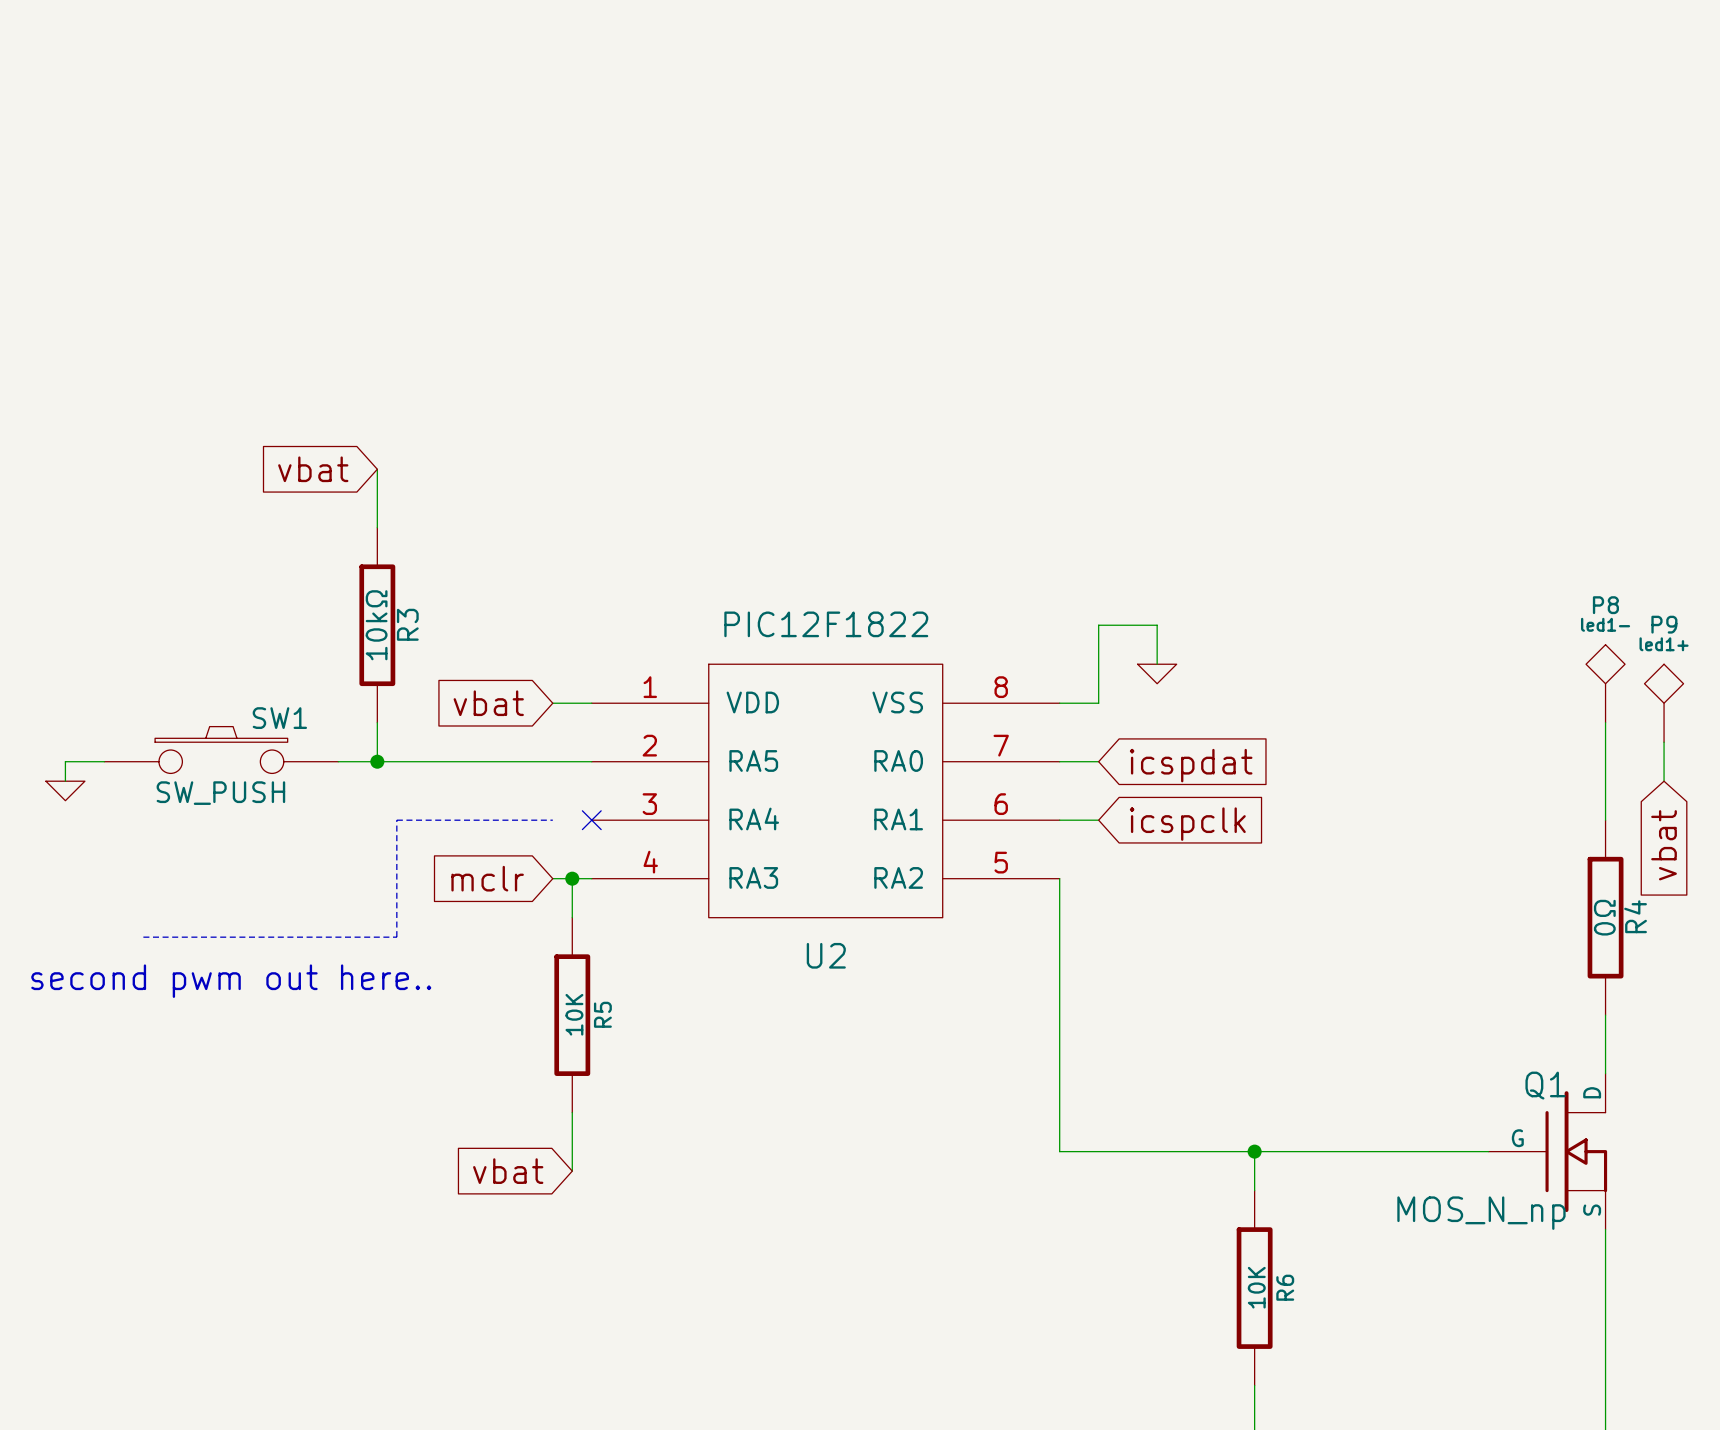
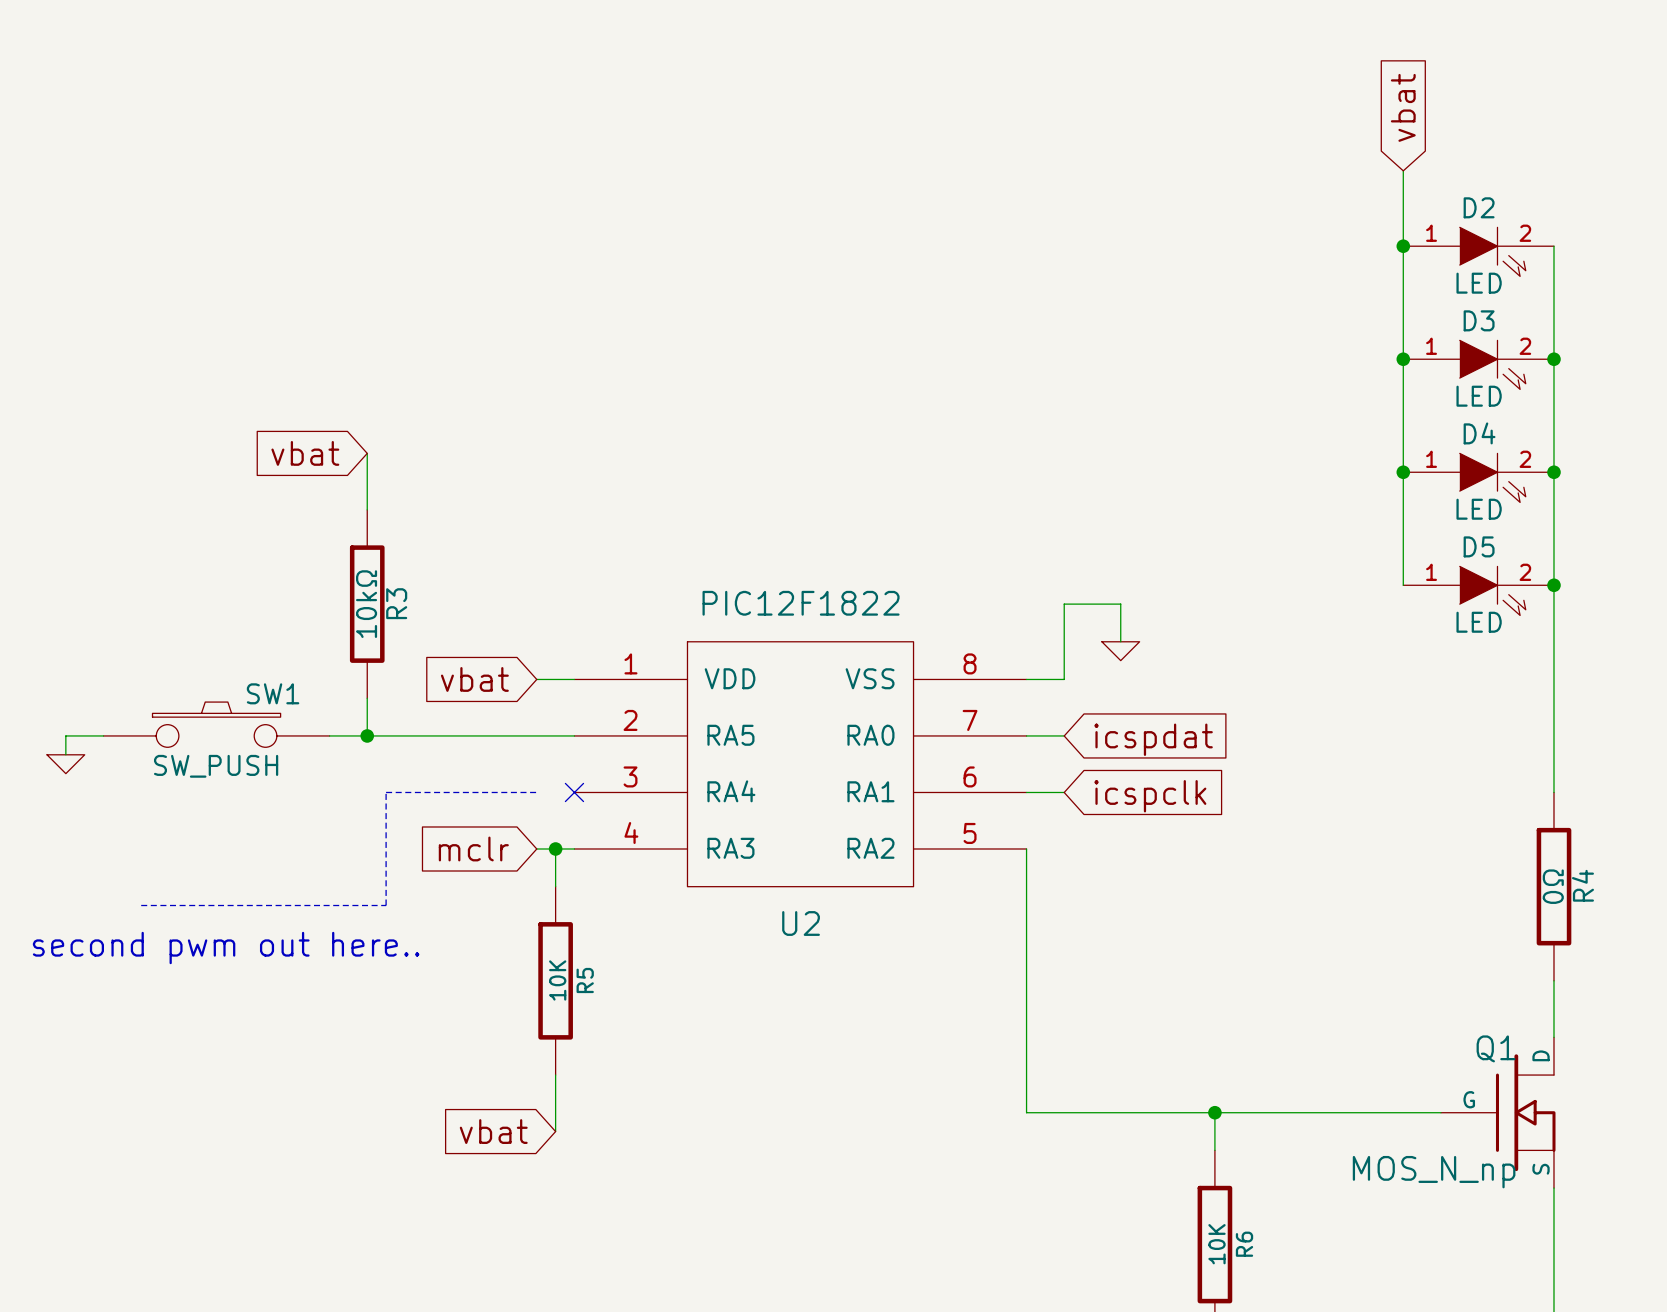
global label: none -> vbat (1403, 107)
wire: none -> (1403, 170) (1403, 585)
junction: none -> (1403, 246)
wire: none -> (1553, 246) (1553, 698)
D2: none -> LED (1478, 251)
junction: none -> (1403, 359)
junction: none -> (1553, 359)
D3: none -> LED (1478, 364)
junction: none -> (1403, 472)
junction: none -> (1553, 472)
D4: none -> LED (1478, 477)
junction: none -> (1553, 585)
D5: none -> LED (1478, 590)
P8: led1- (1605, 683) -> none
P9: led1+ (1664, 703) -> none
wire: (1664, 742) (1664, 781) -> none
global label: vbat (1664, 845) -> none

